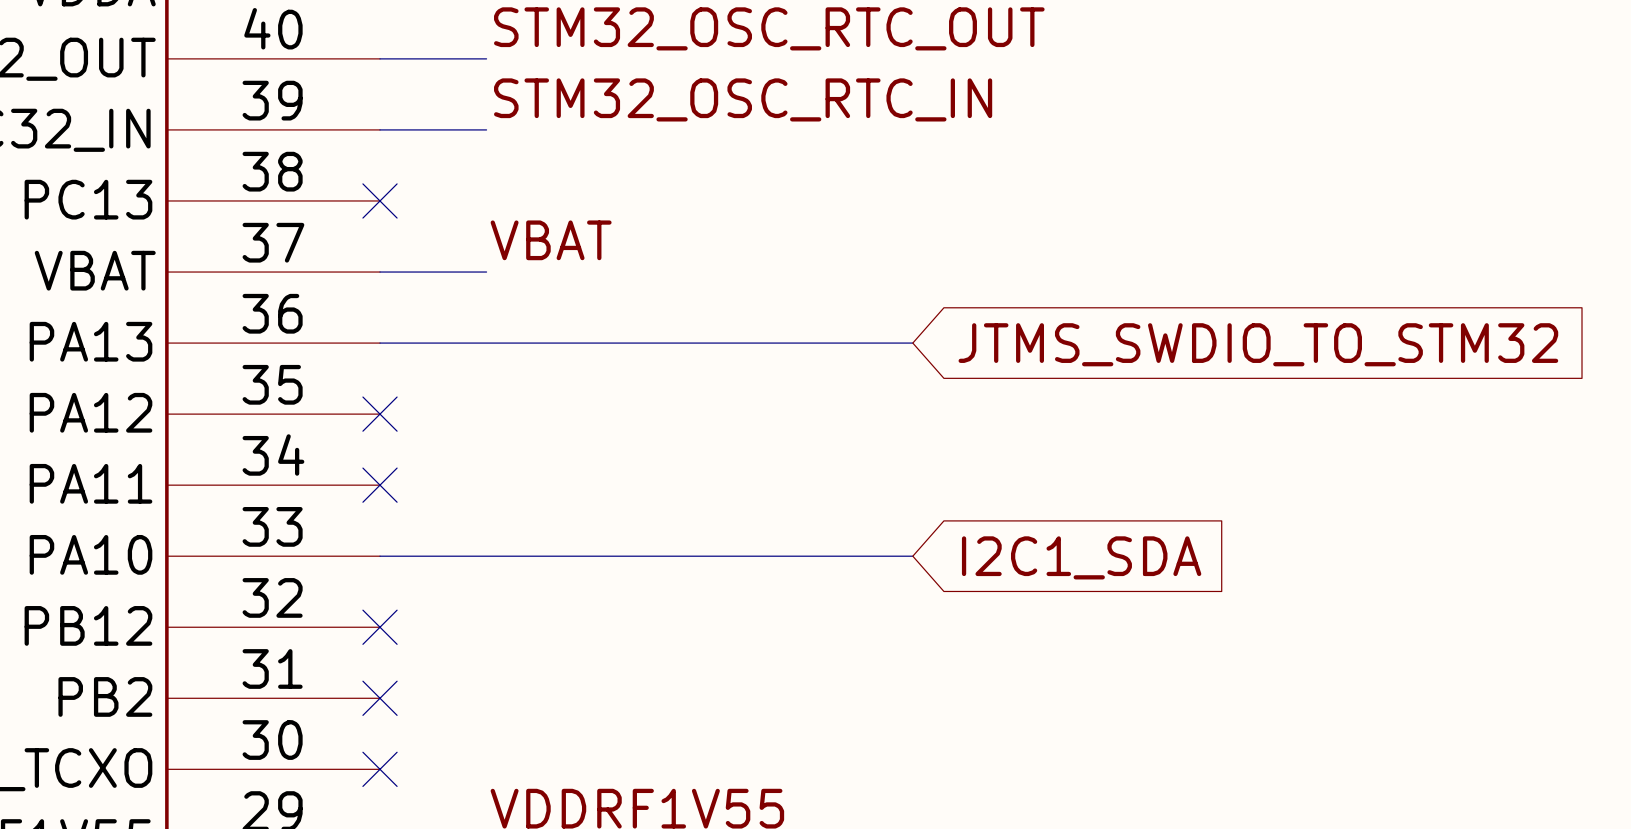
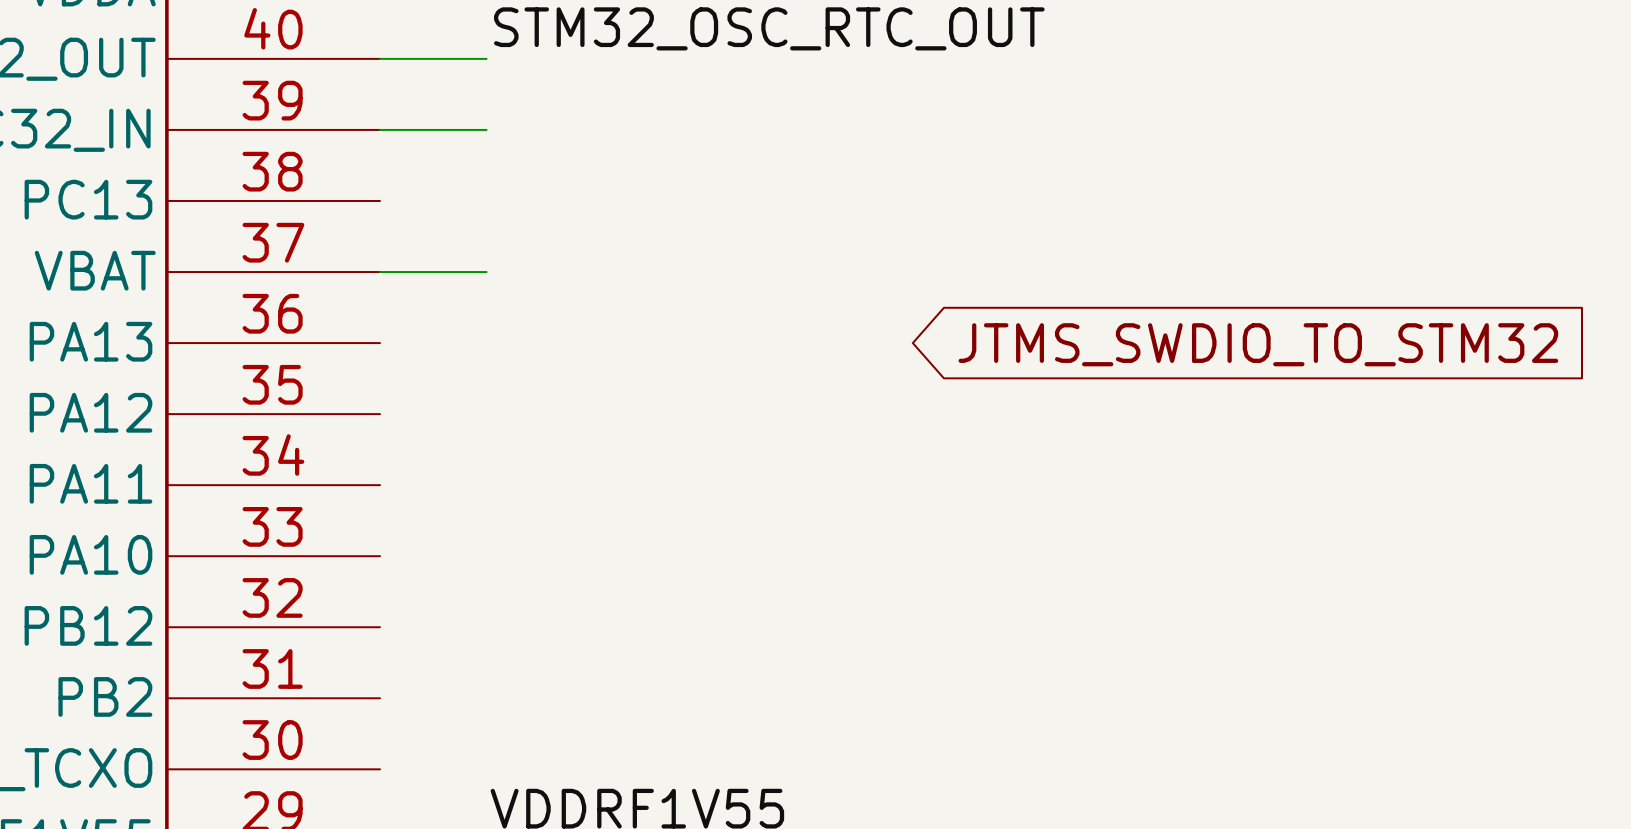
label: STM32_OSC_RTC_IN (743, 99) -> none
no-connect mark: (380, 200) -> none
label: VBAT (551, 240) -> none
wire: (380, 343) (912, 343) -> none
no-connect mark: (380, 414) -> none
no-connect mark: (380, 485) -> none
wire: (380, 556) (912, 556) -> none
global label: I2C1_SDA (1081, 557) -> none
no-connect mark: (380, 627) -> none
no-connect mark: (380, 698) -> none
no-connect mark: (380, 769) -> none

